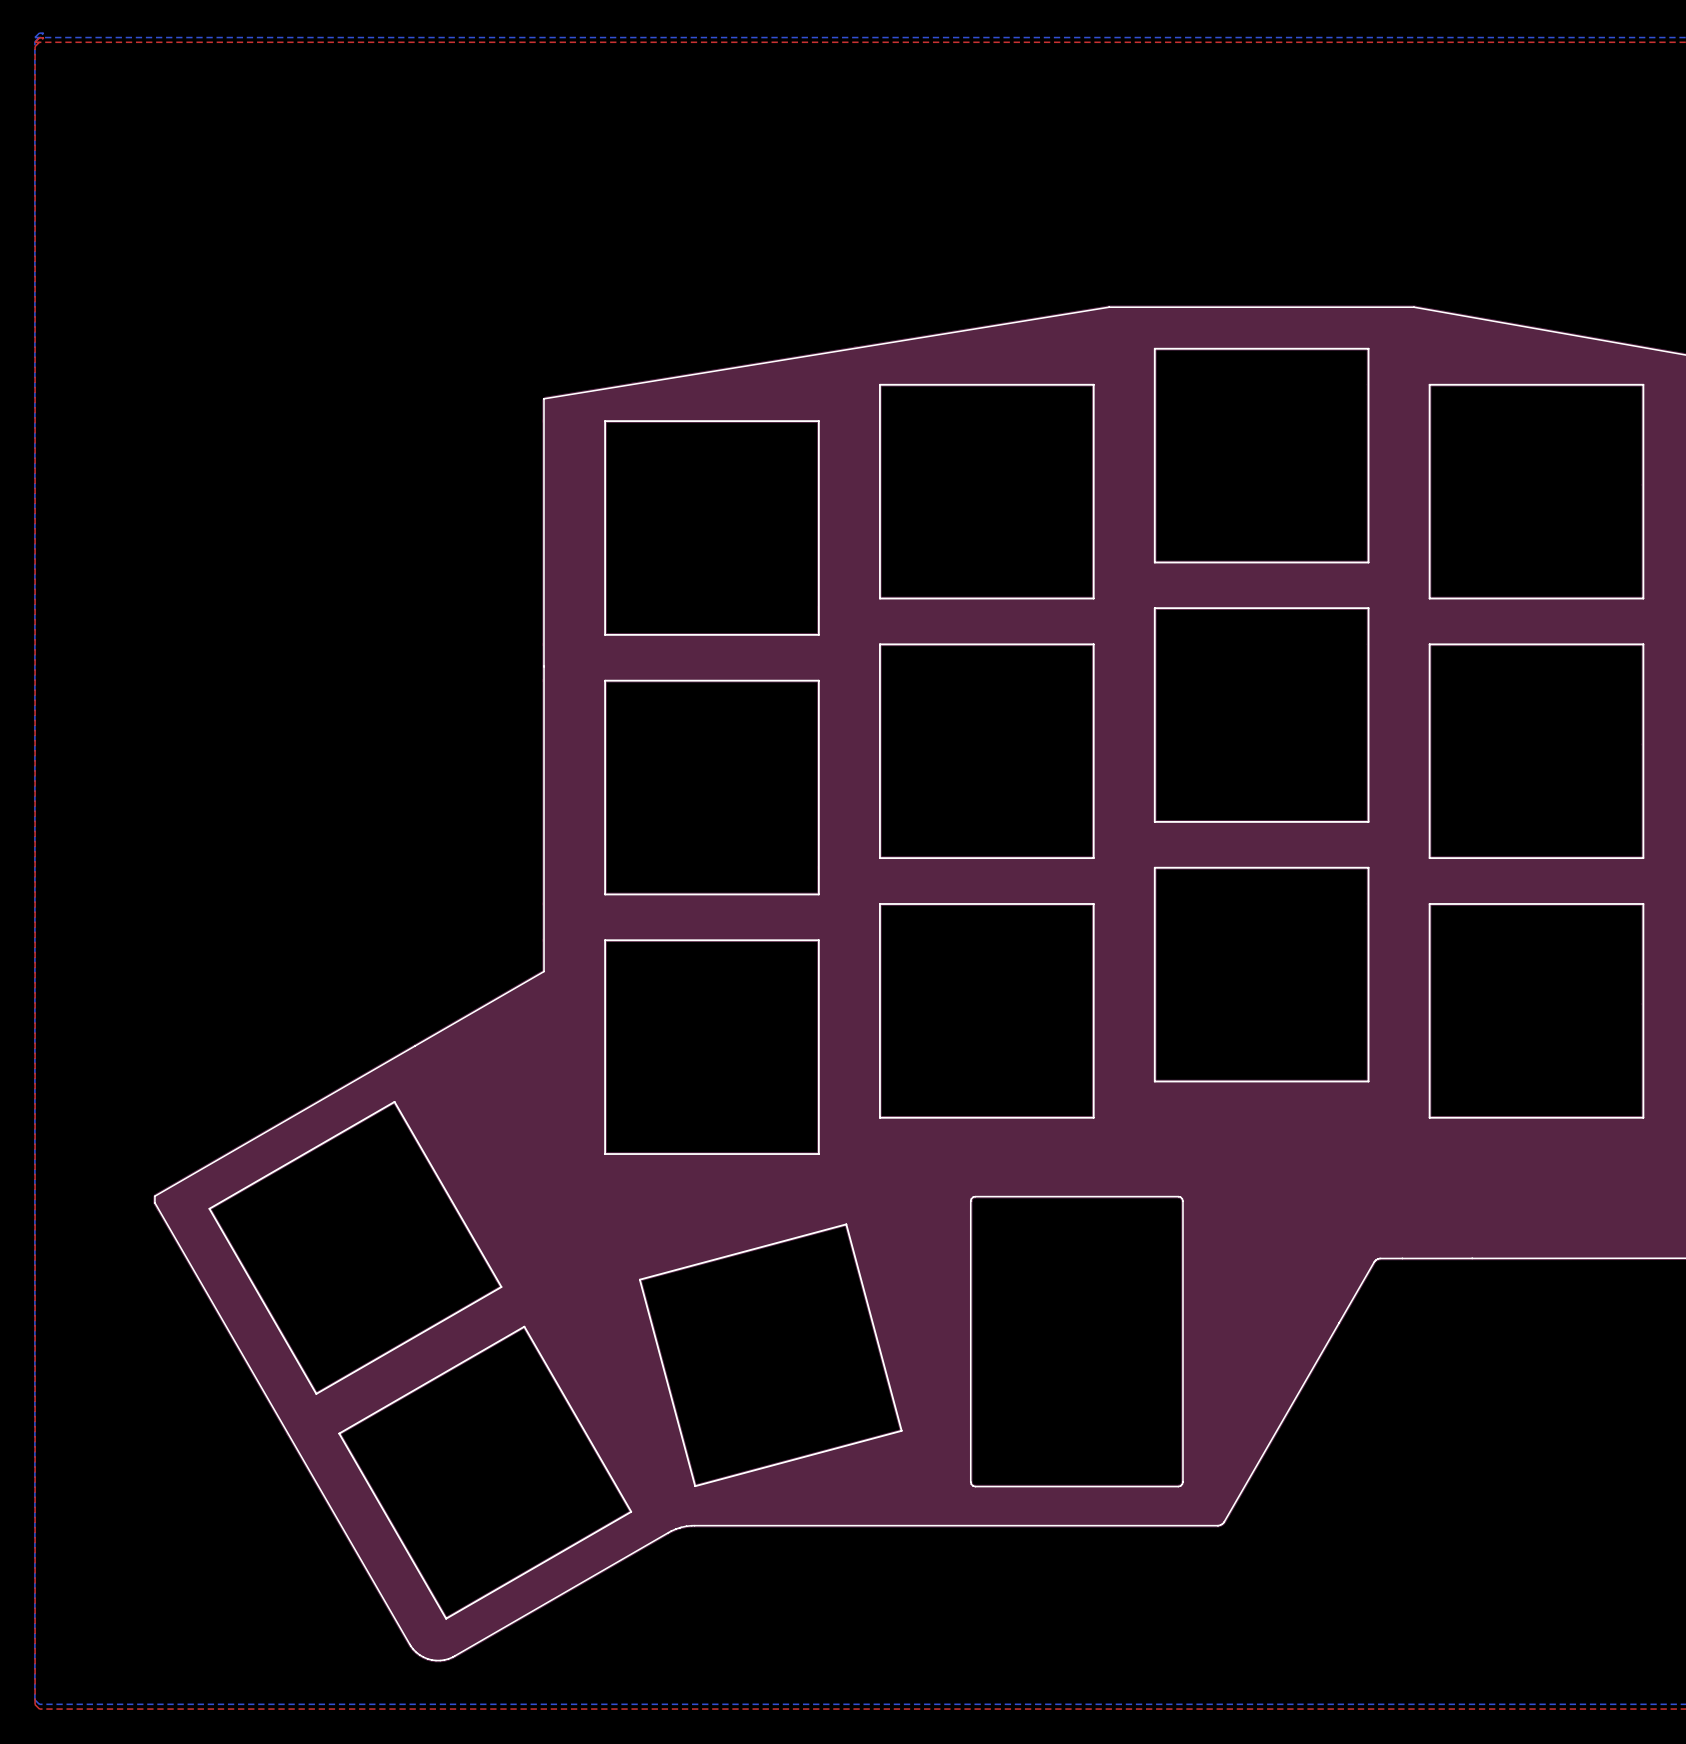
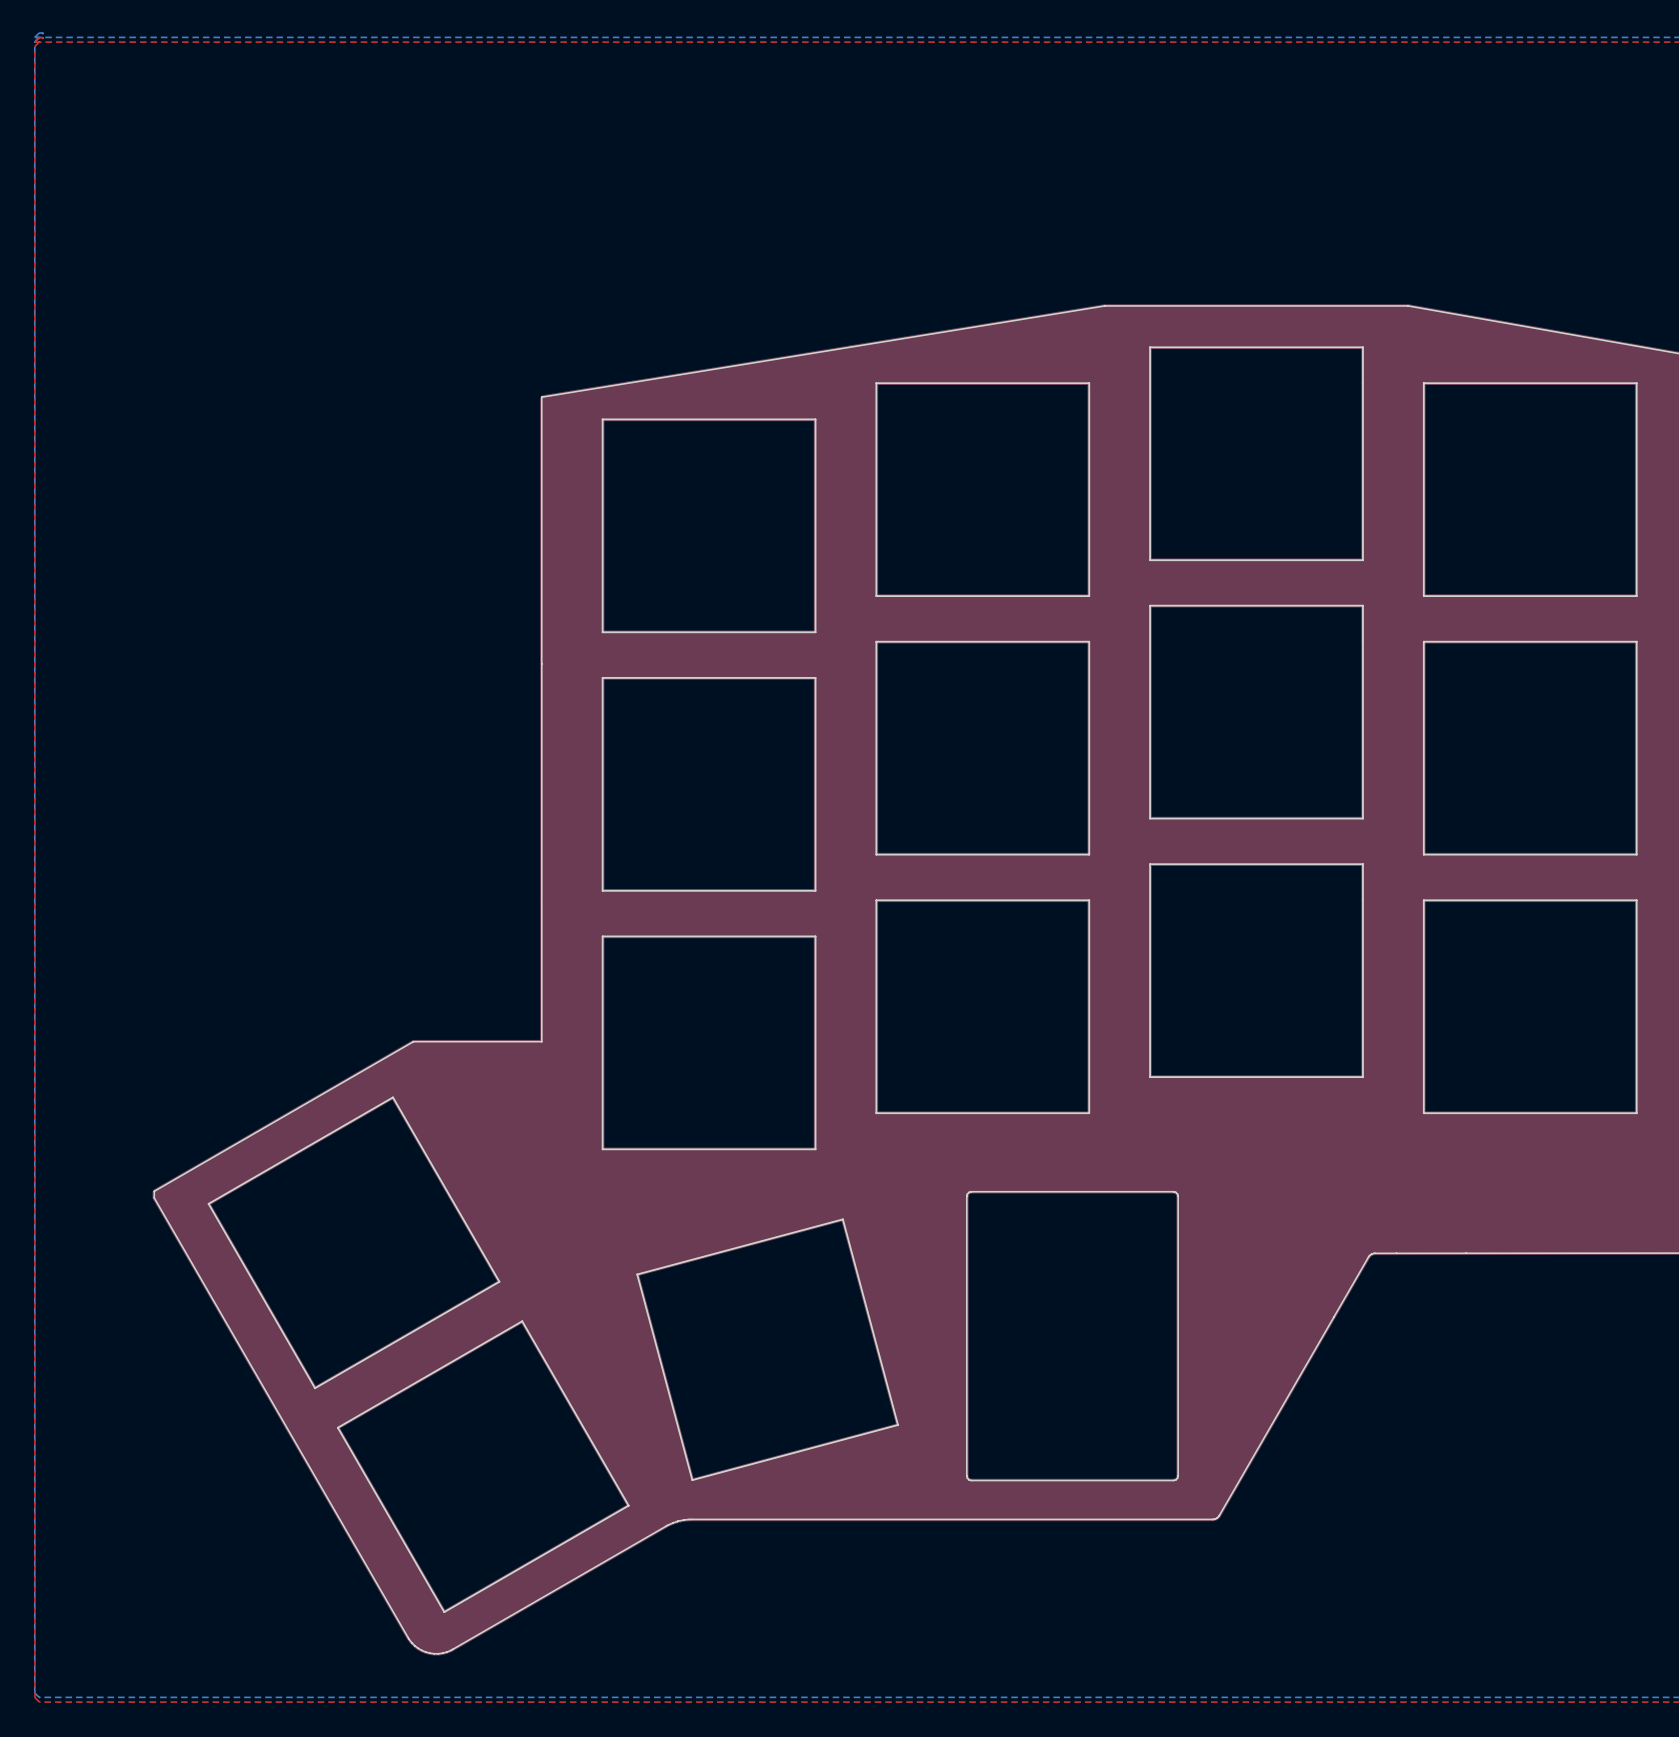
board edge: (544, 971) (415, 1045) -> (541, 967) (541, 1041) (413, 1041)

